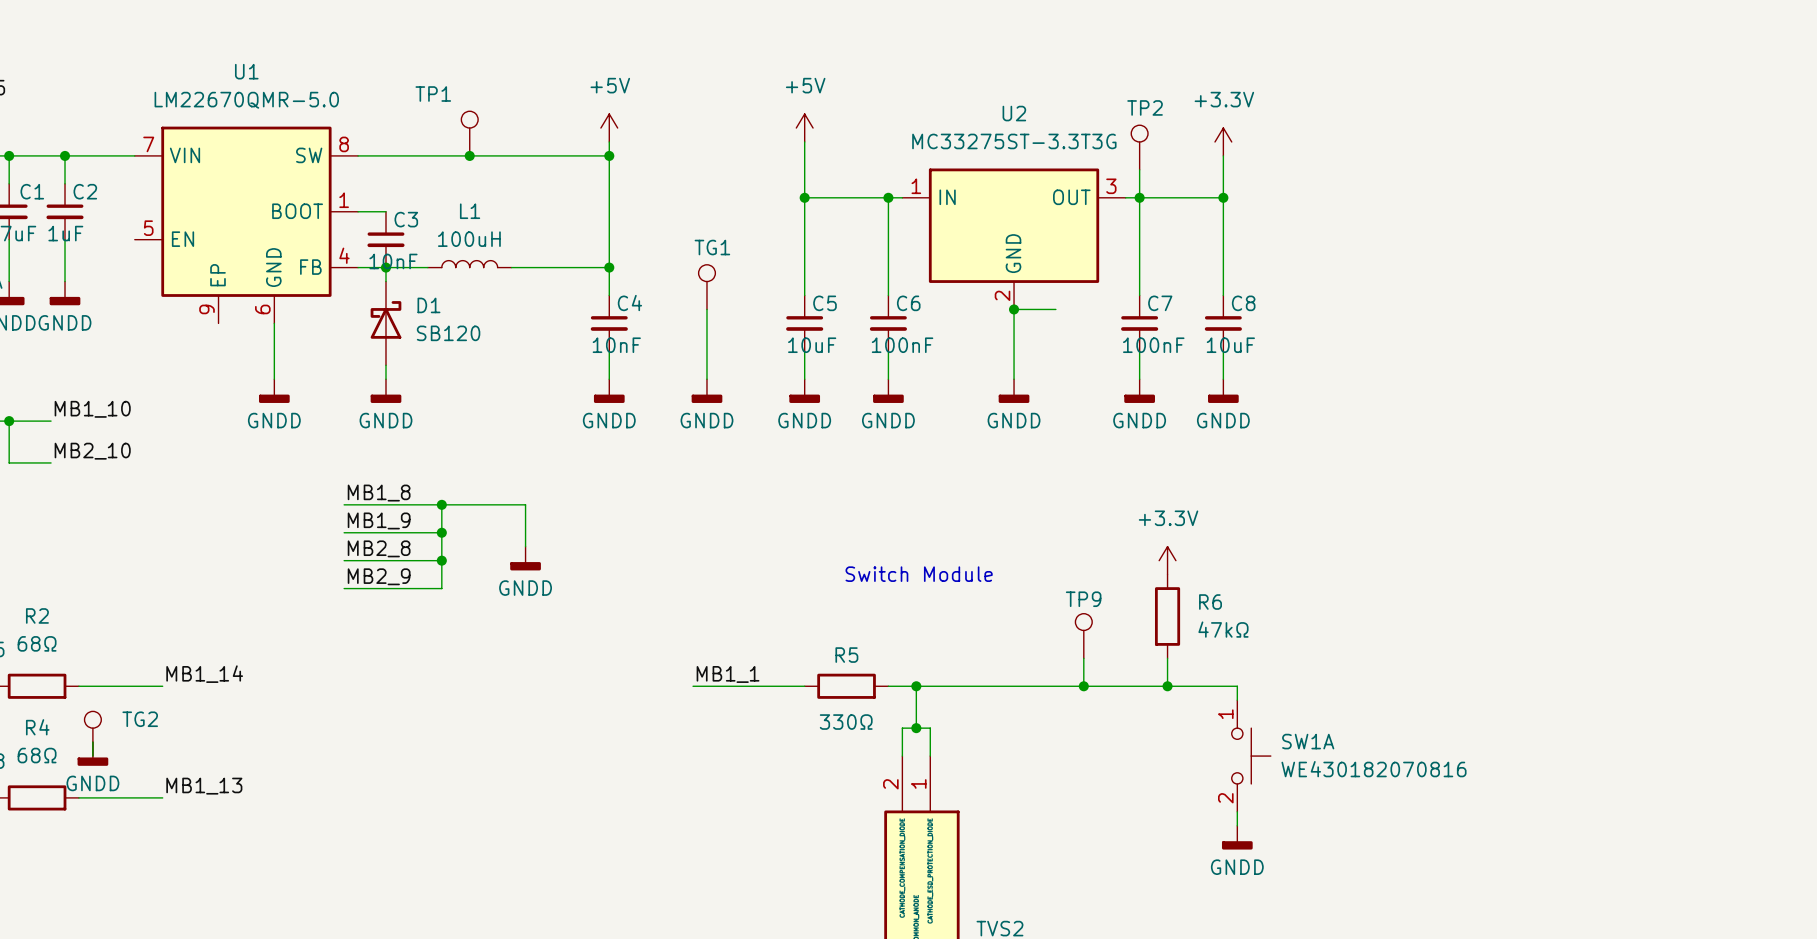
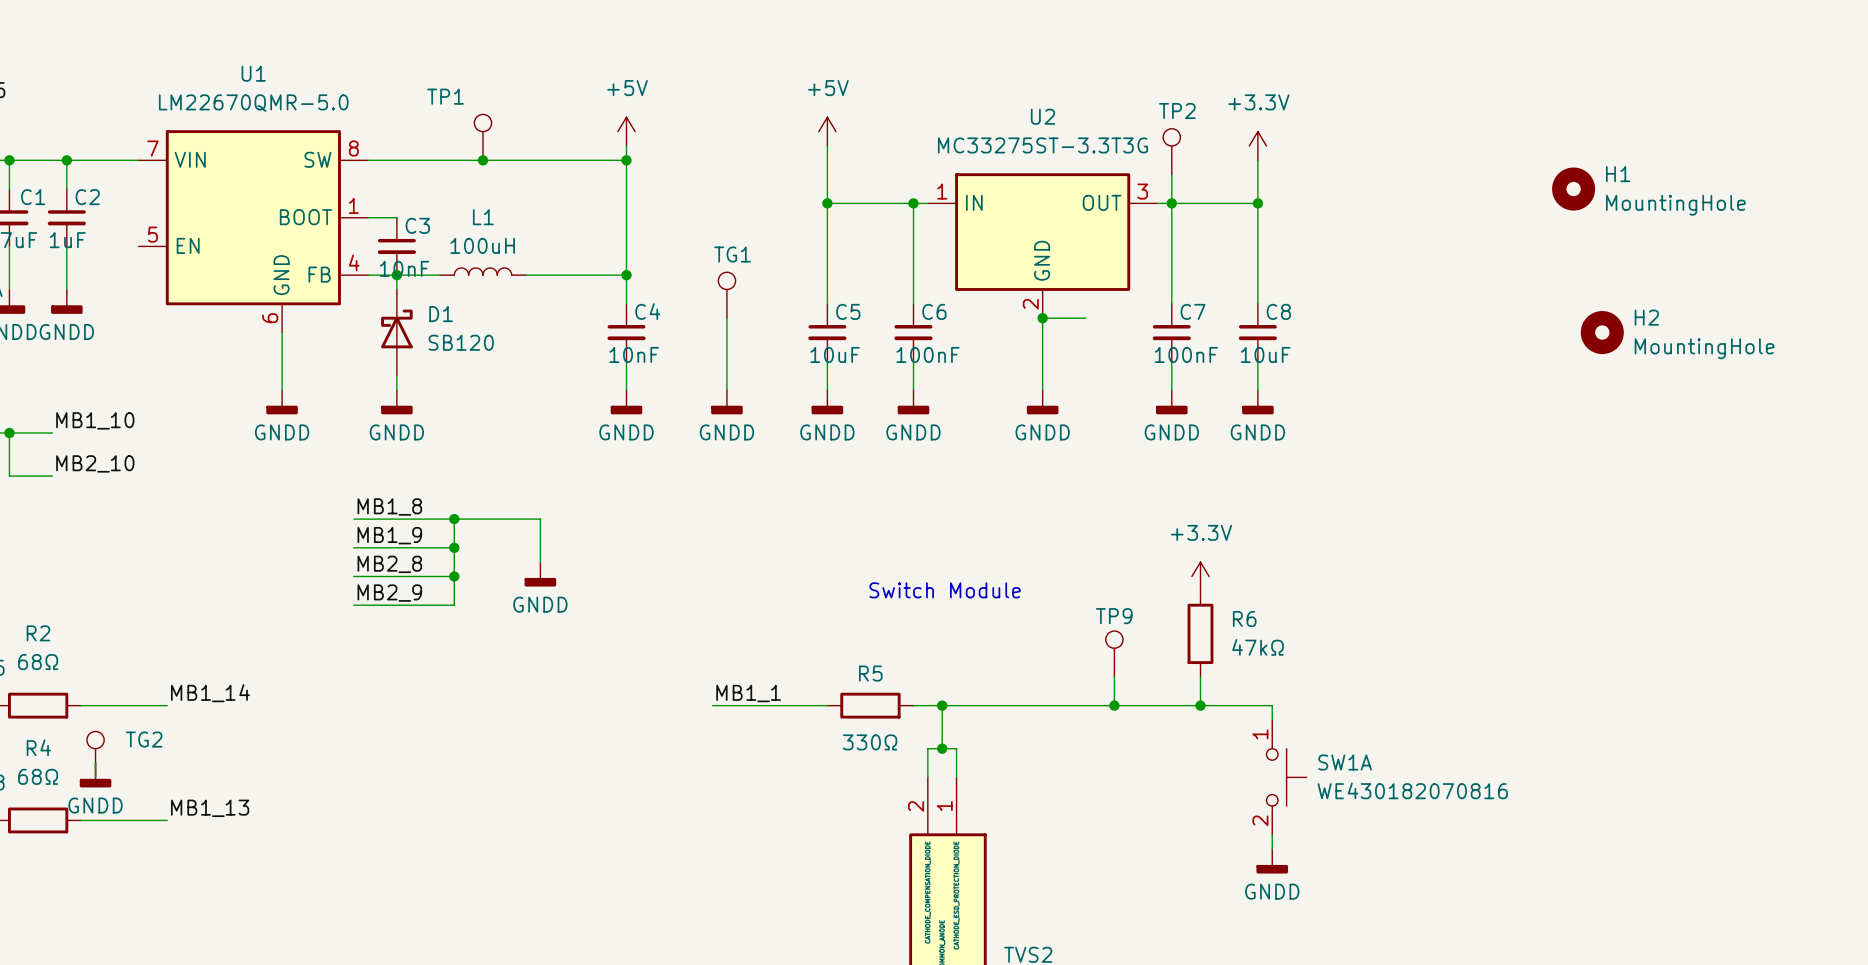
U1 symbol: [134, 126, 359, 324] -> [138, 130, 369, 333]
H1: none -> MountingHole (1573, 189)
H2: none -> MountingHole (1602, 332)

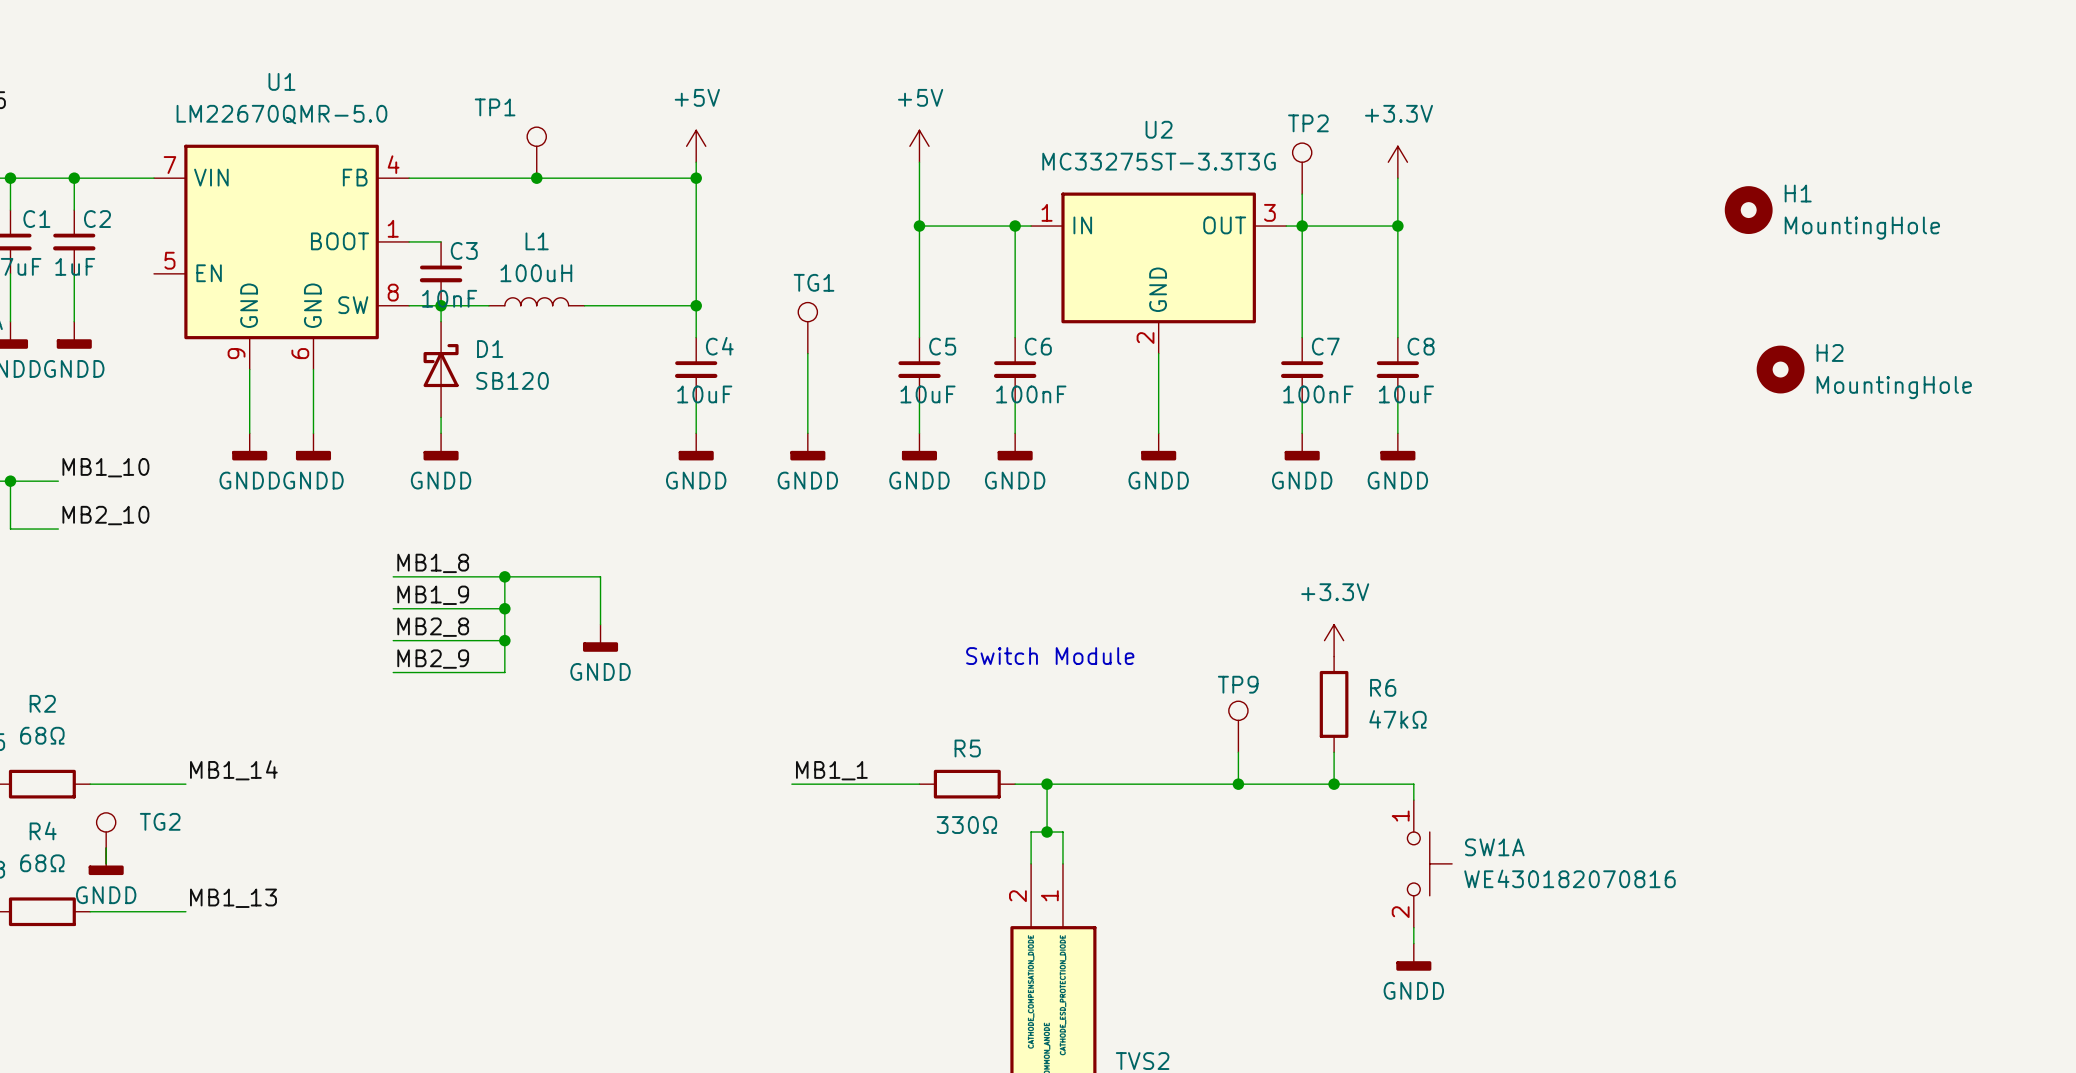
U1 symbol: [138, 130, 369, 333] -> [154, 144, 410, 370]
wire: (1042, 318) (1085, 318) -> none
junction: (1042, 318) -> none
wire: none -> (249, 369) (249, 433)
C4 value: 10nF (634, 354) -> 10uF (704, 394)
power symbol: none -> GNDD (249, 446)

